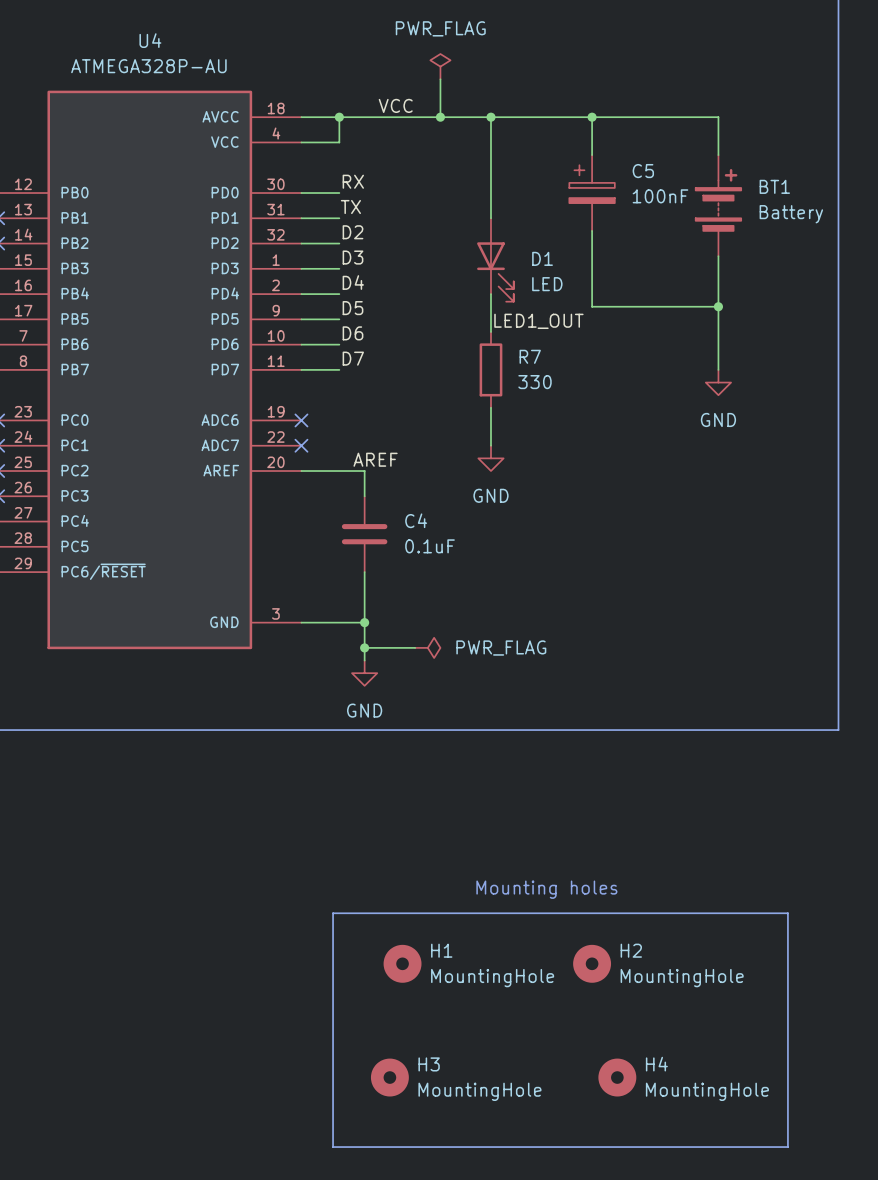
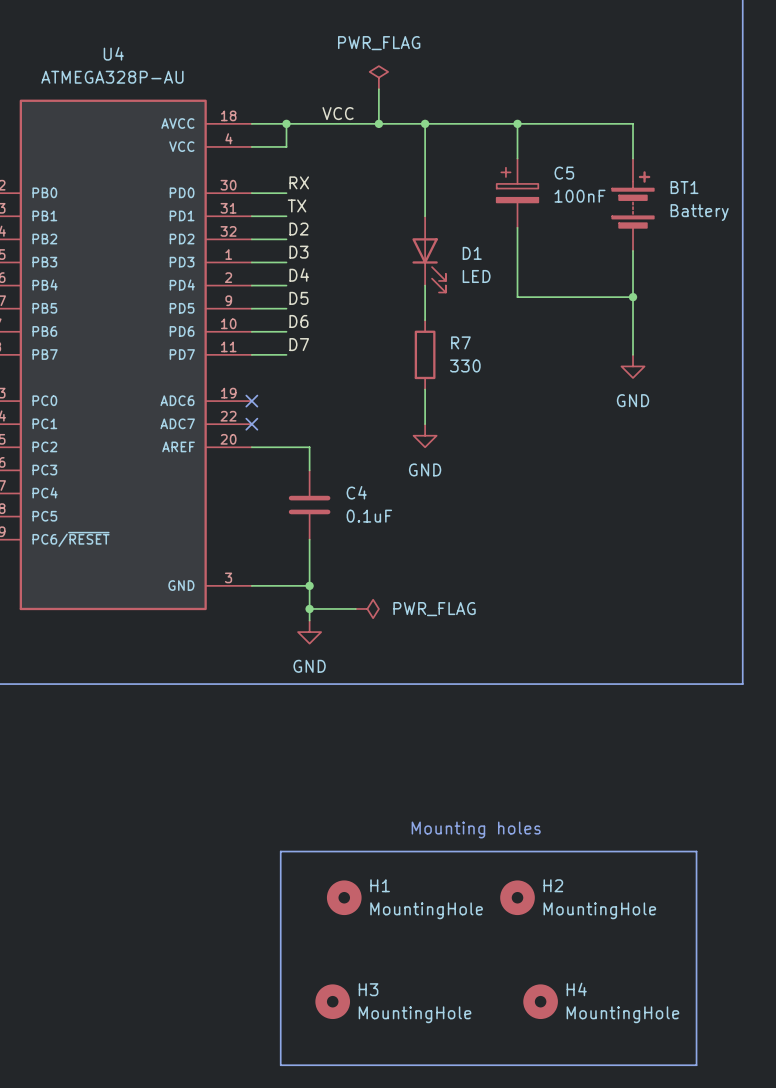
label: LED1_OUT (538, 321) -> none
label: AREF (375, 459) -> none

